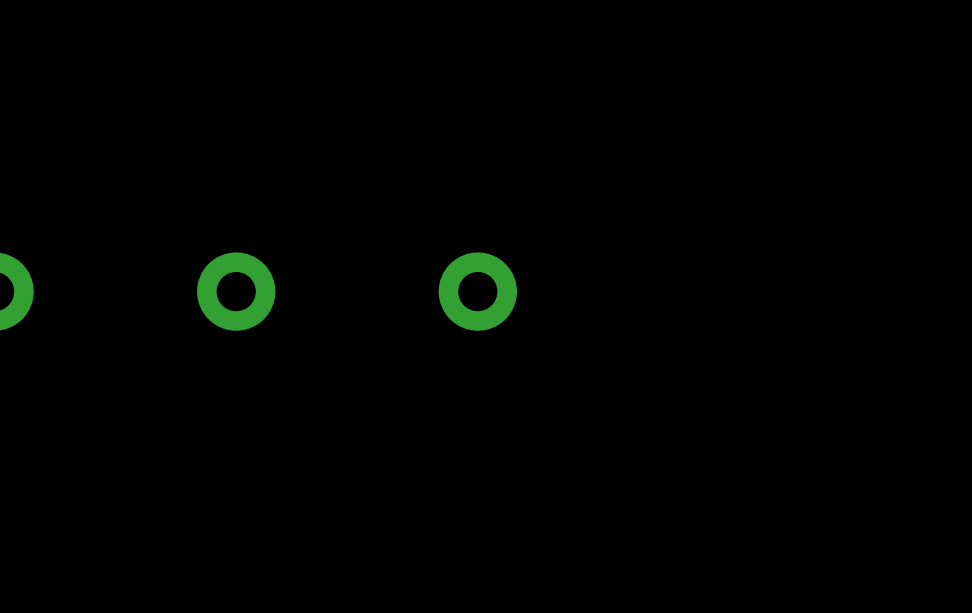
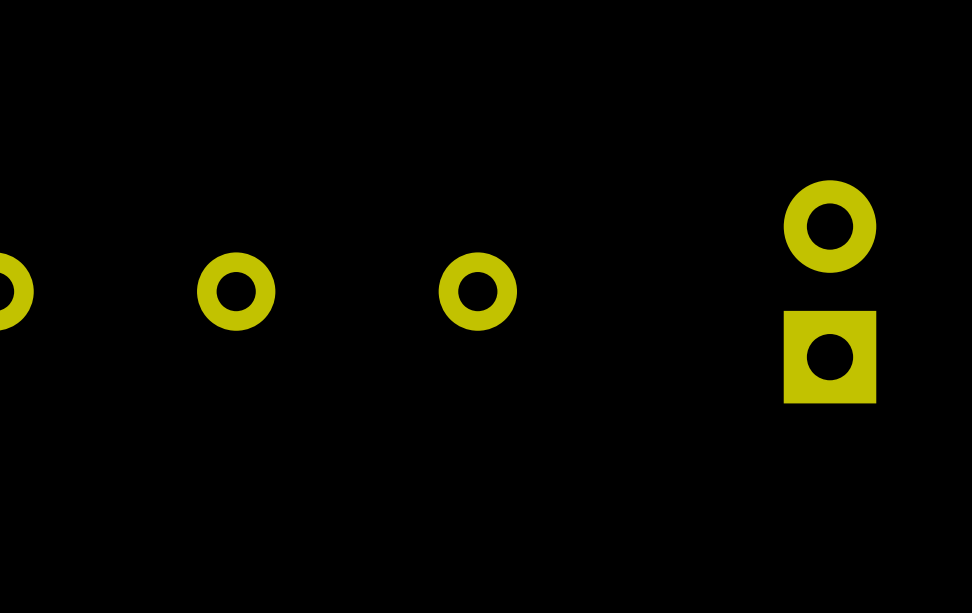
part: none -> (830, 291)

